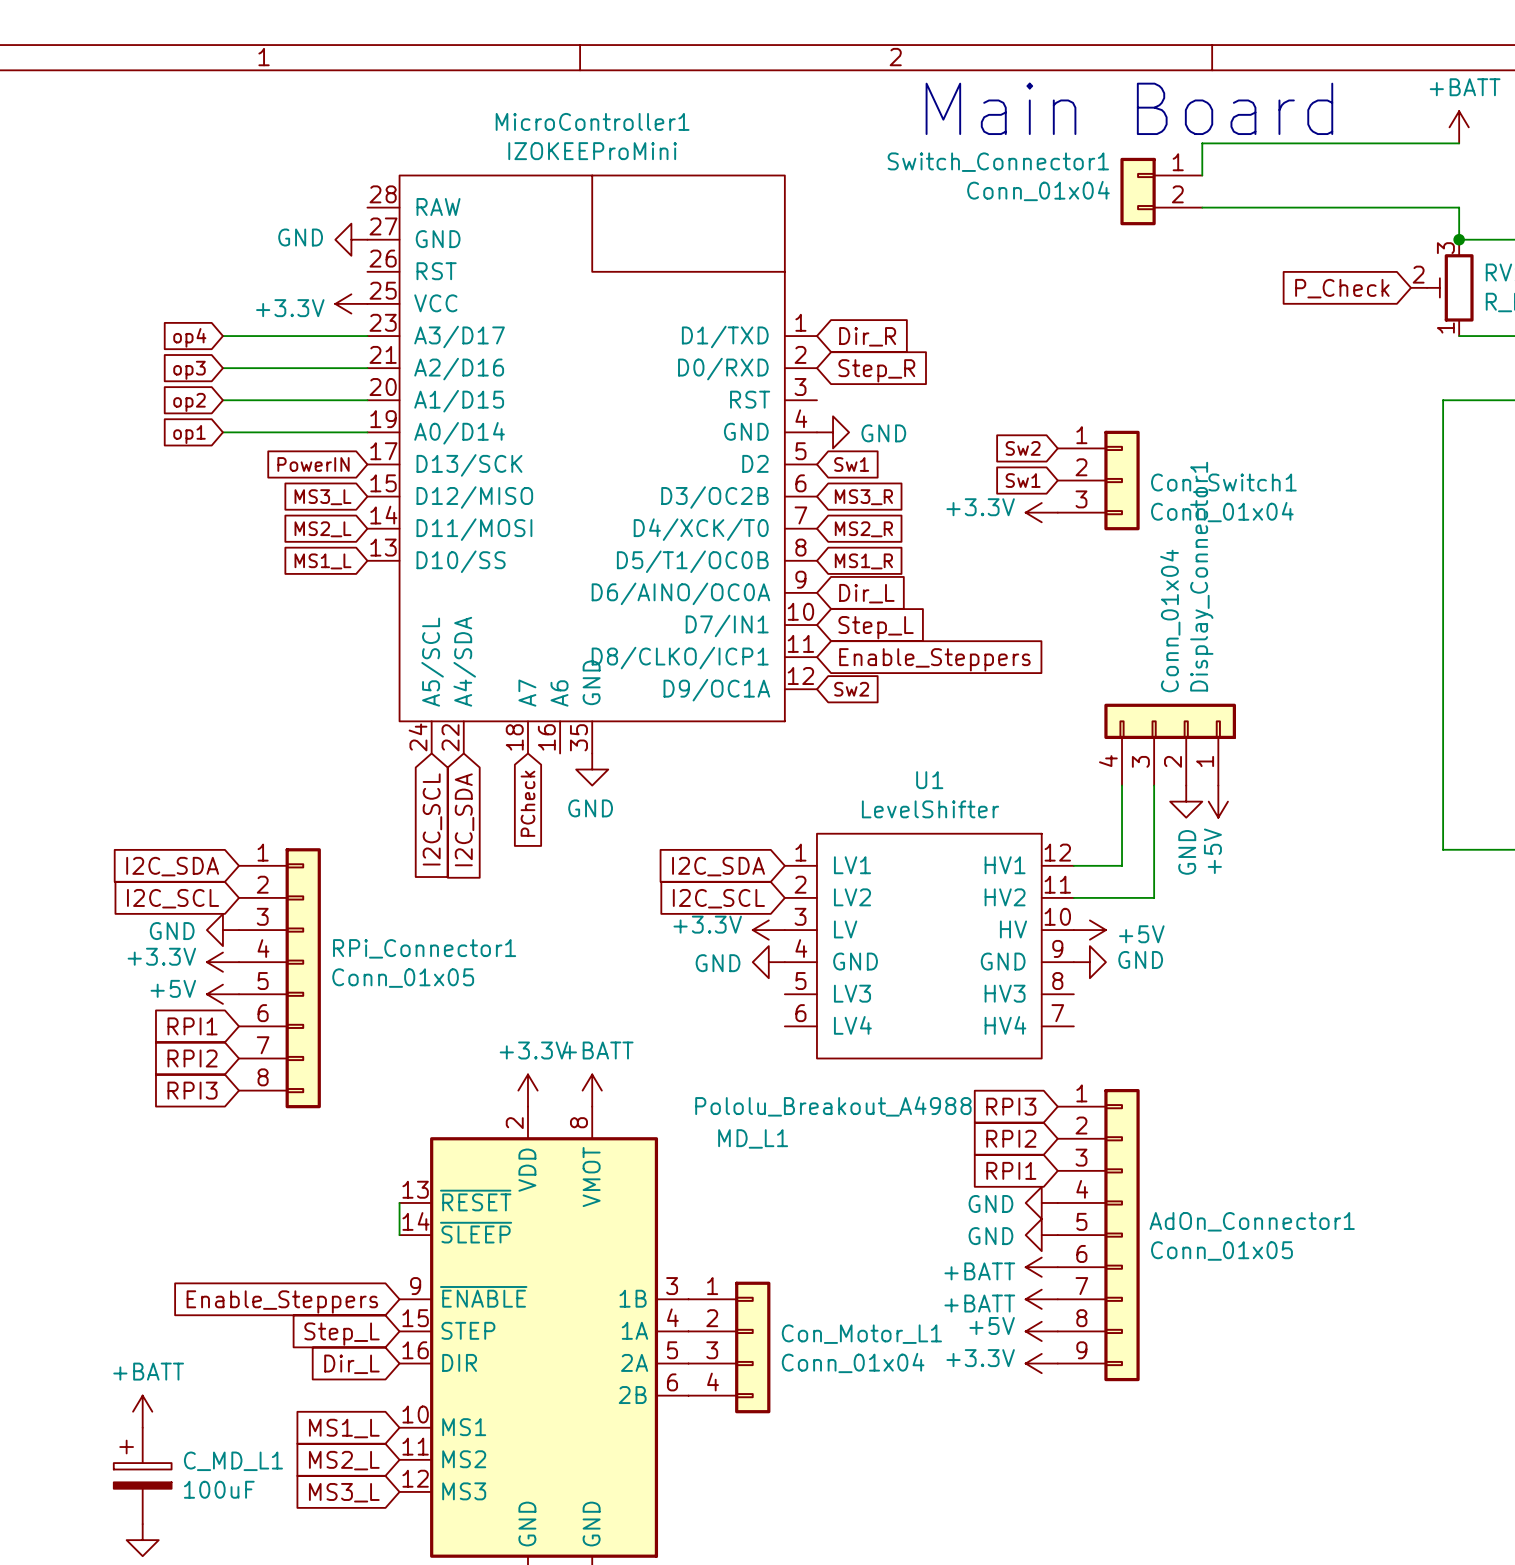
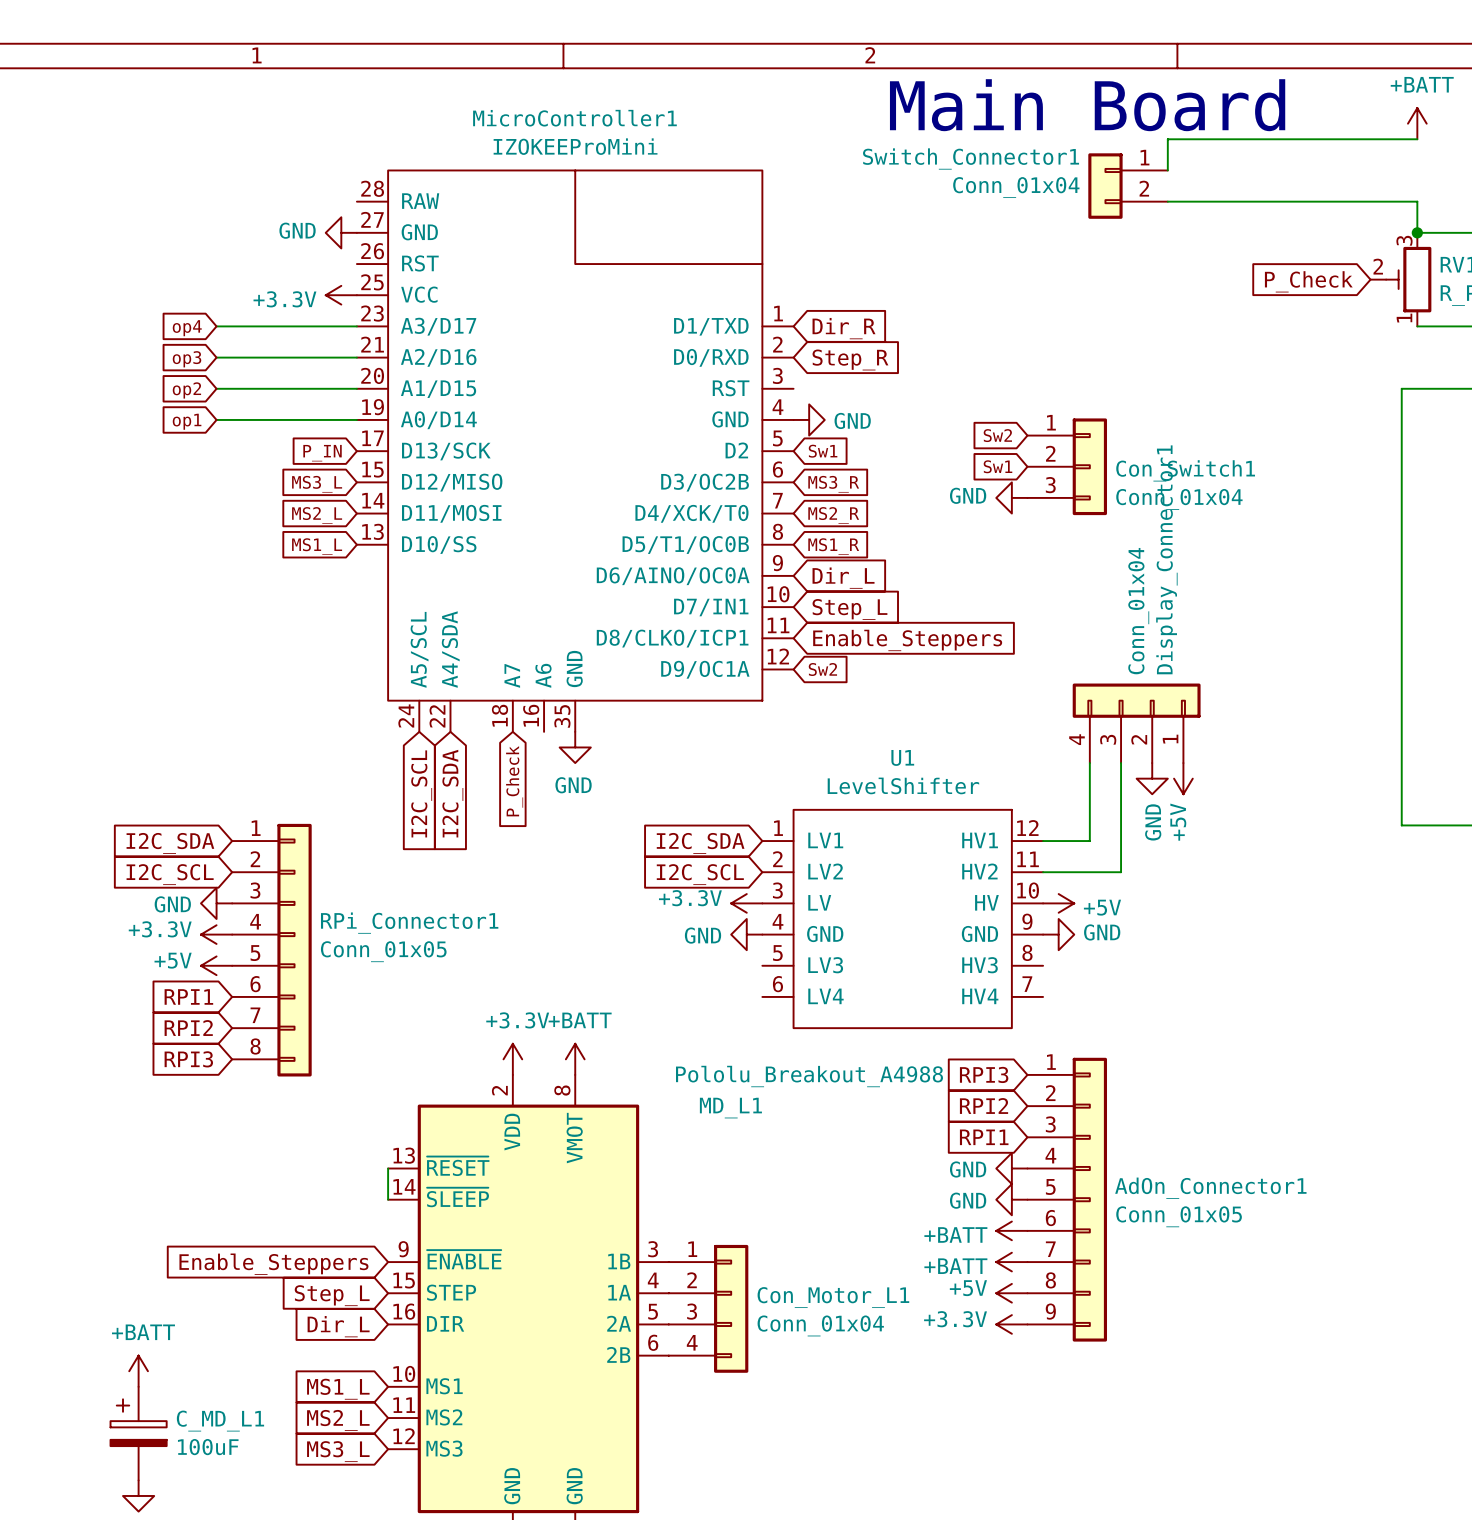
global label: PowerIN (313, 464) -> P_IN (322, 453)
power symbol: +3.3V (1041, 512) -> GND (1011, 497)
global label: PCheck (527, 803) -> P_Check (514, 781)

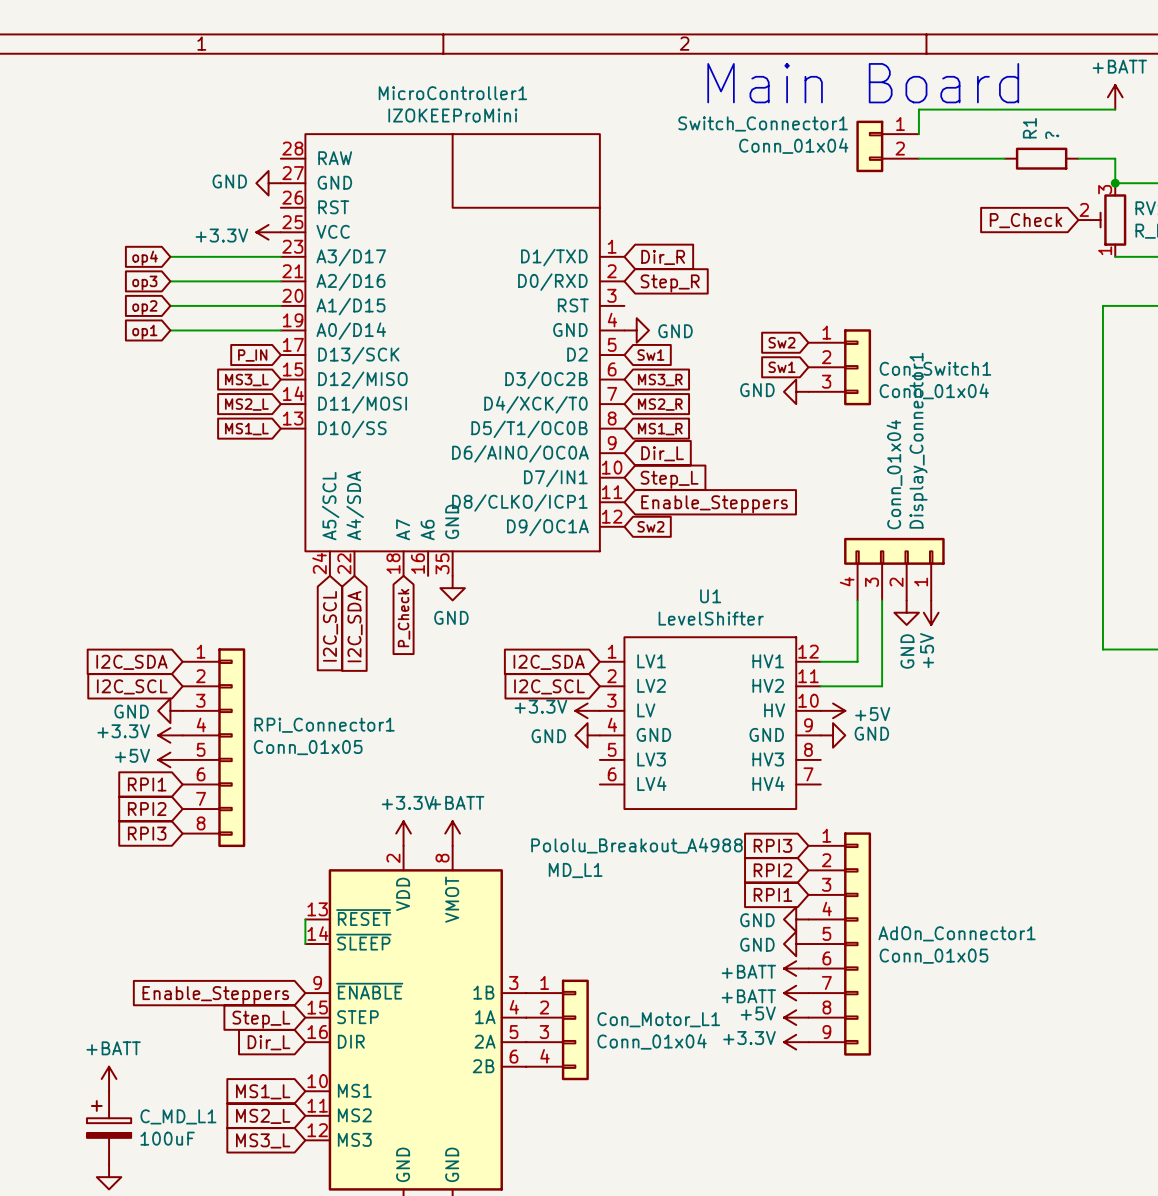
wire: (1276, 201) (1370, 201) -> none
R1: none -> ? (1041, 158)

